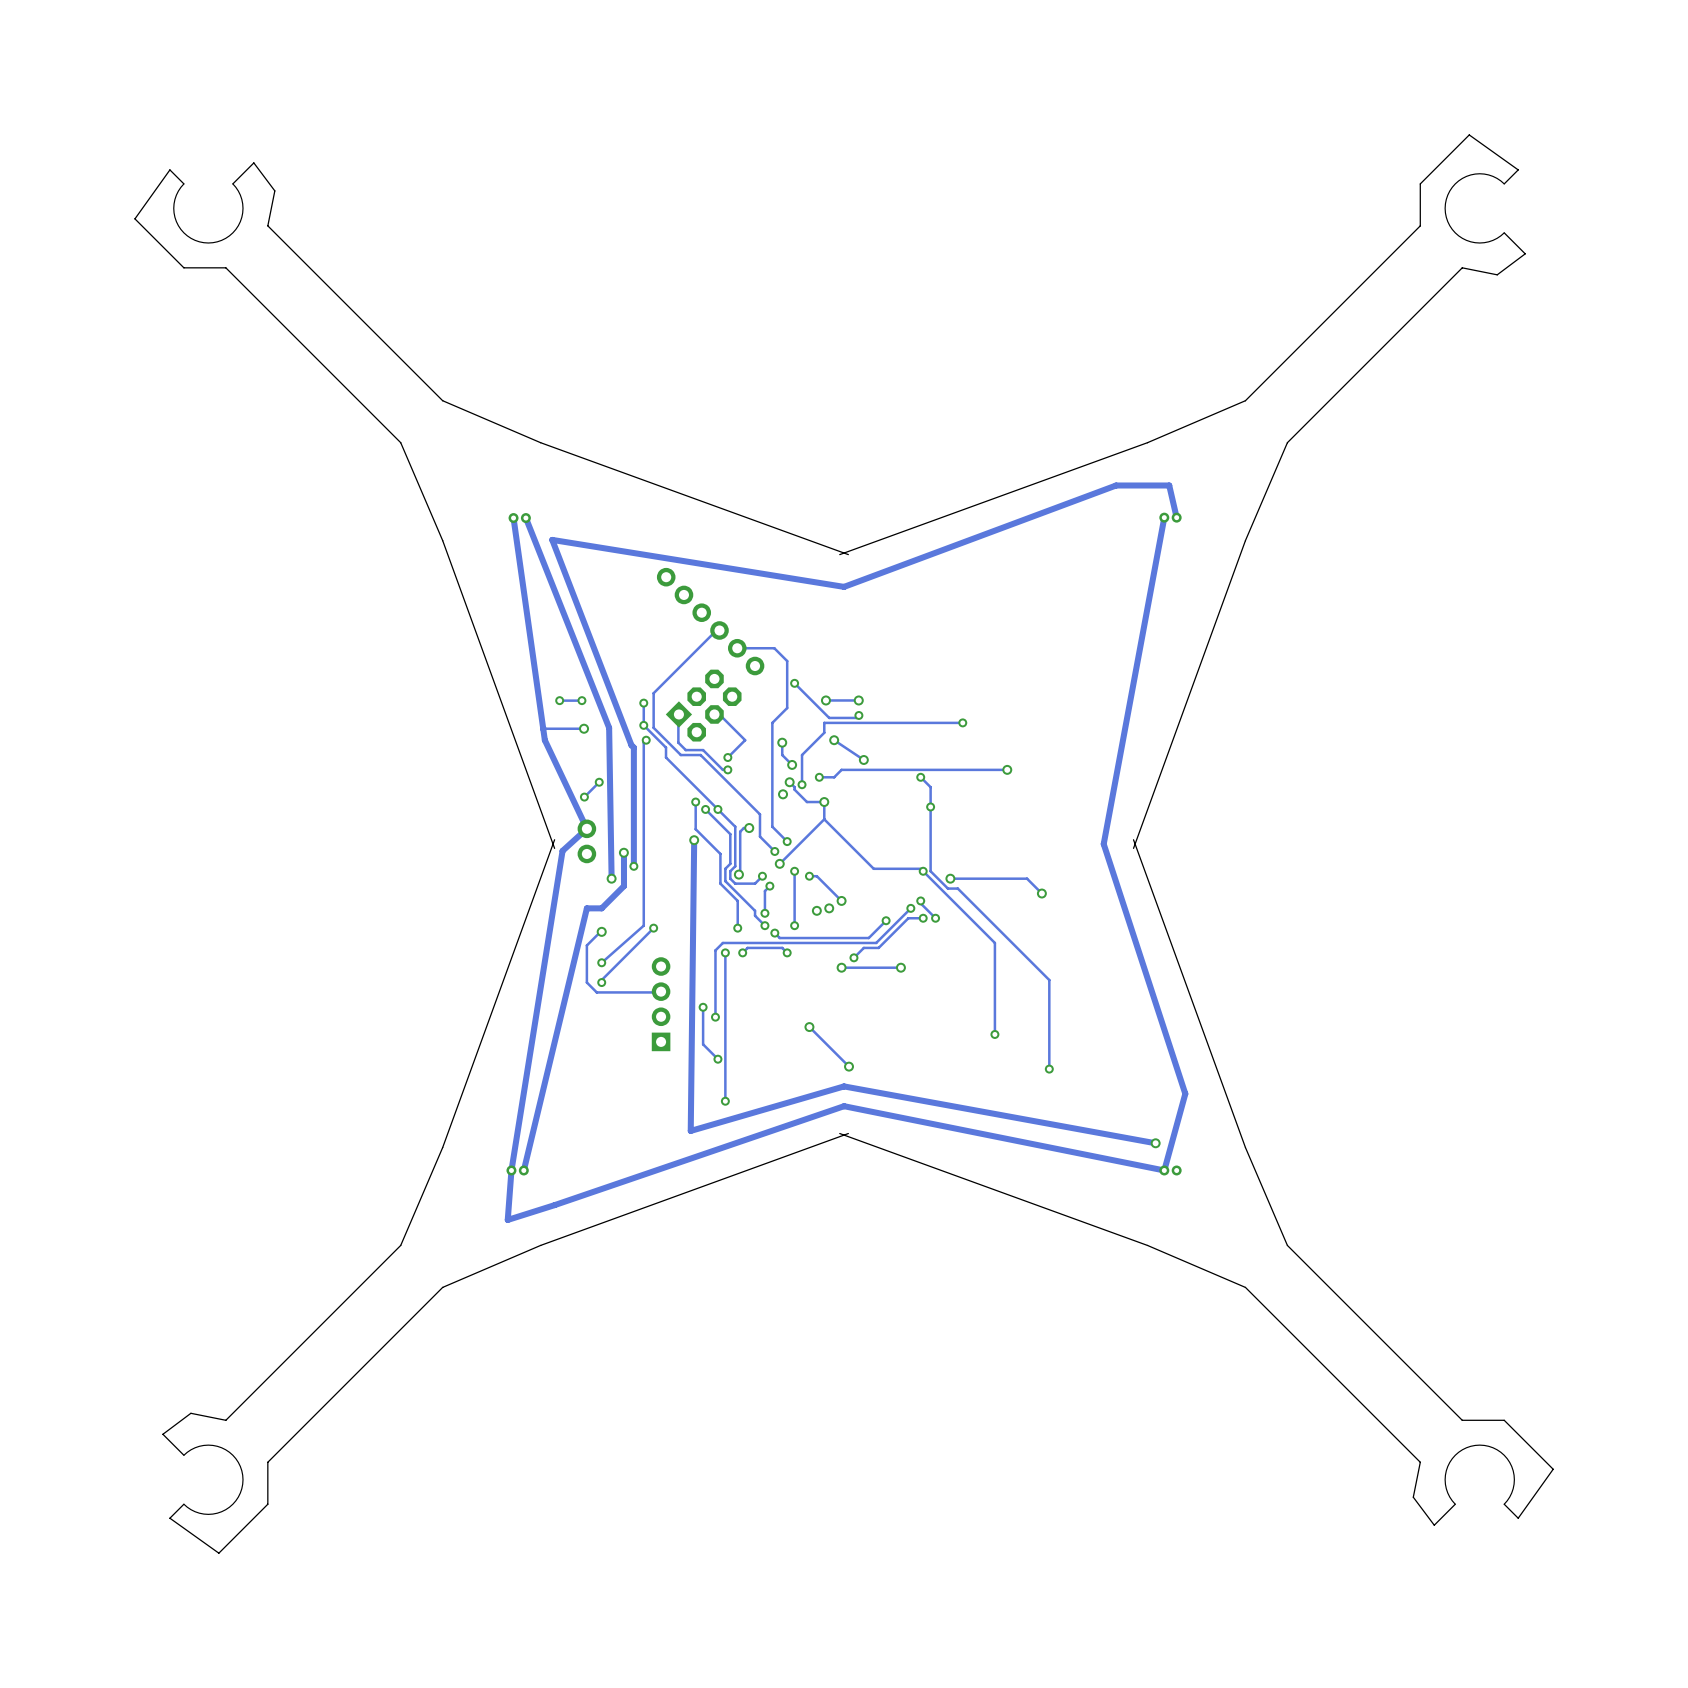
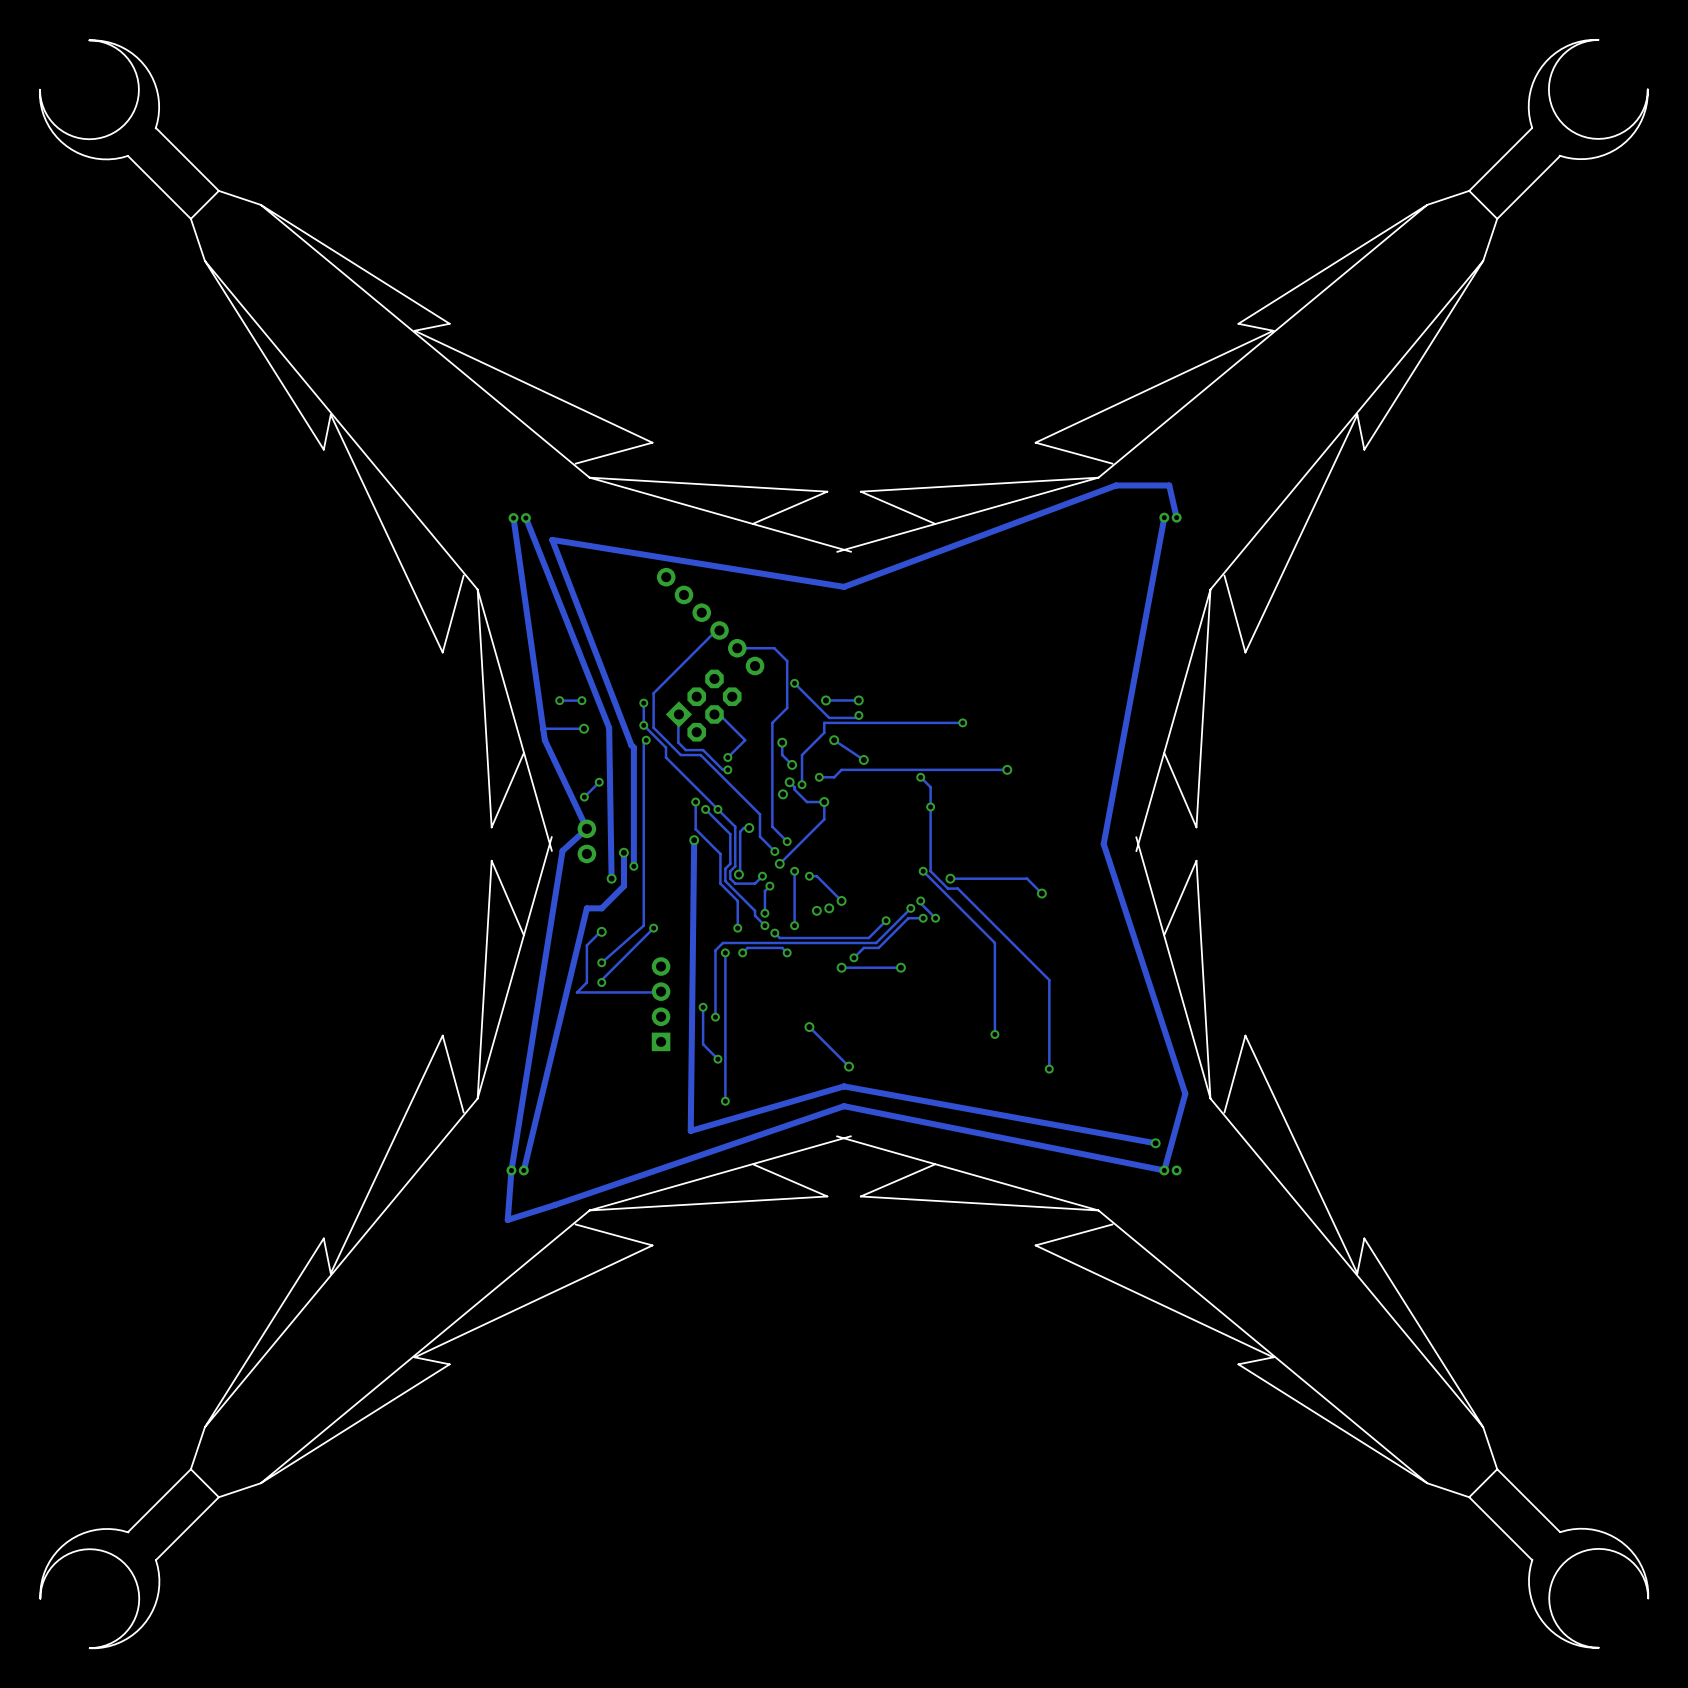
drawing: none -> [39, 39, 1649, 1649]
drawing: [134, 134, 1554, 1554] -> none
track: (824, 819) (873, 868) (923, 868) (923, 871) -> none
track: (586, 982) (596, 992) -> (586, 982) (576, 992) (596, 992)

